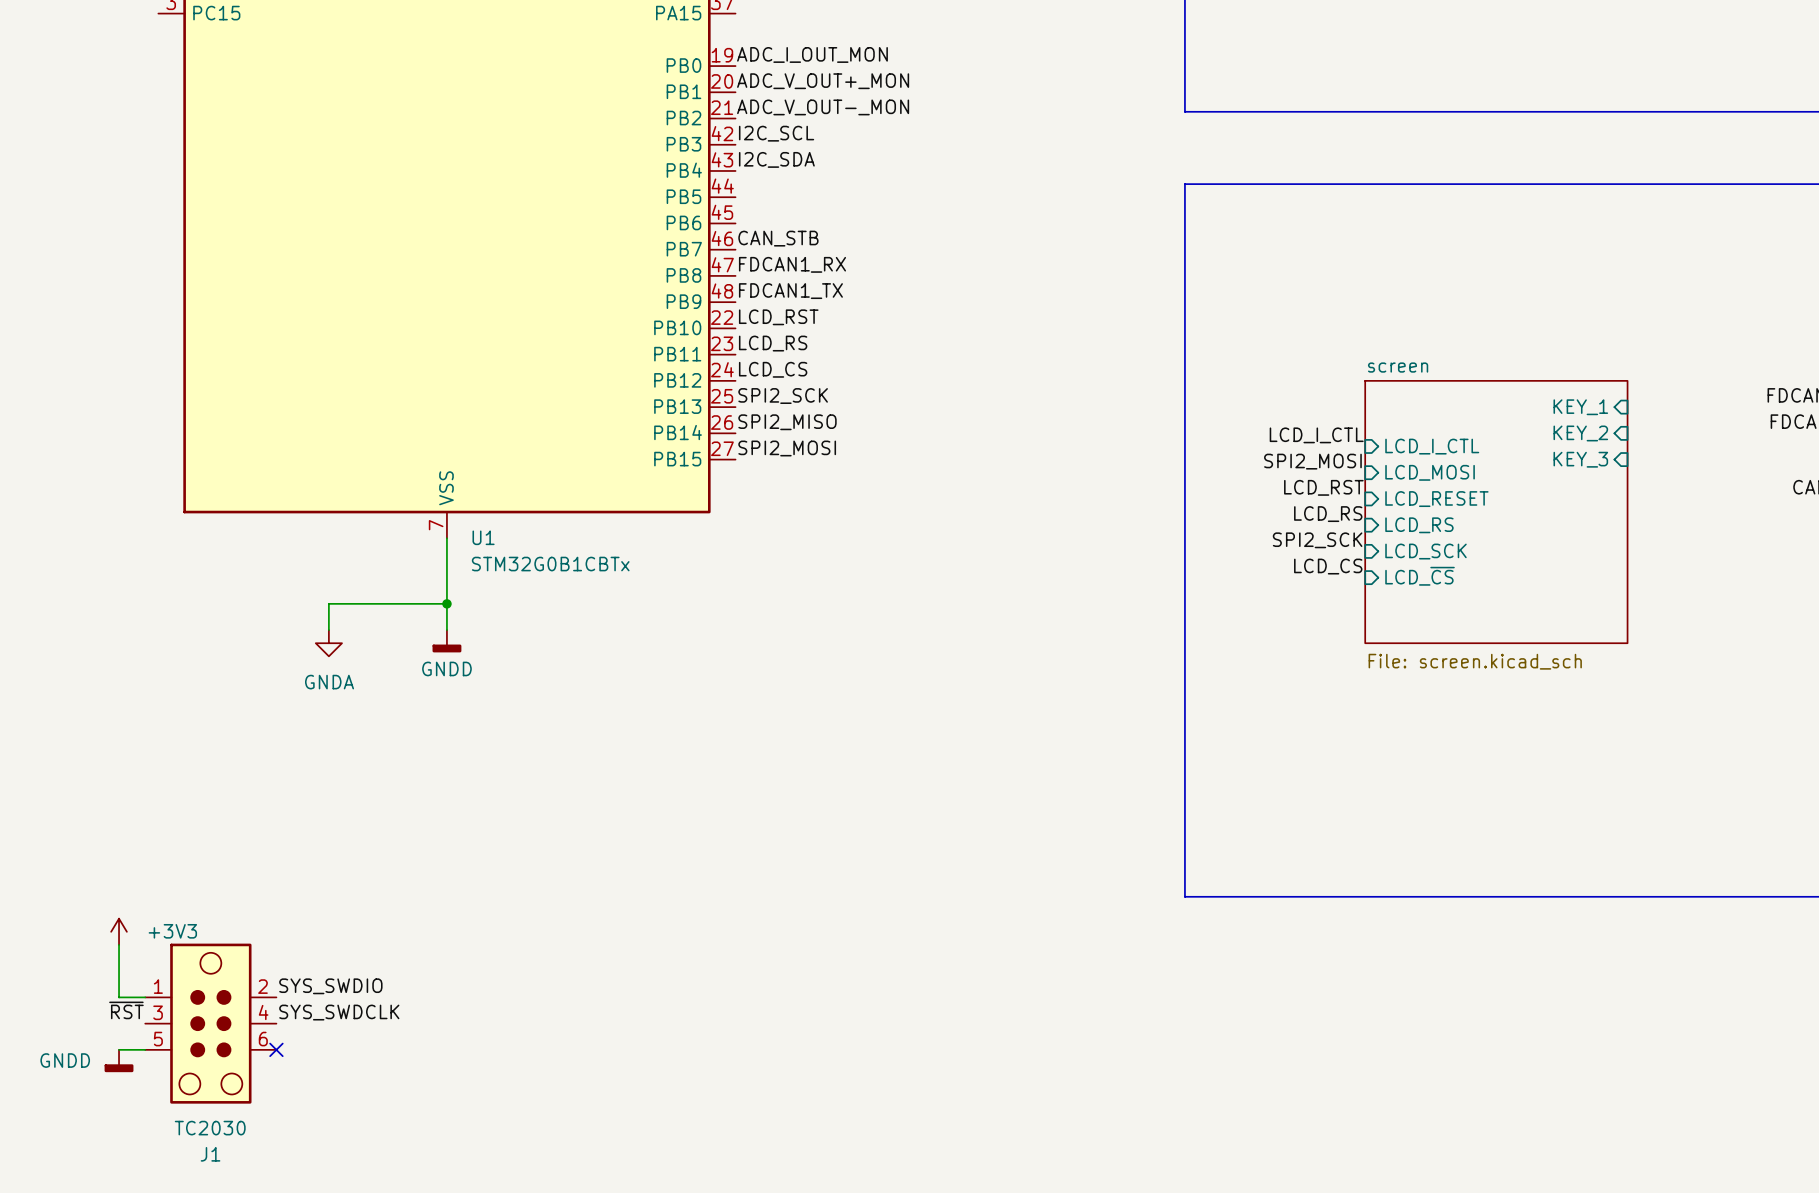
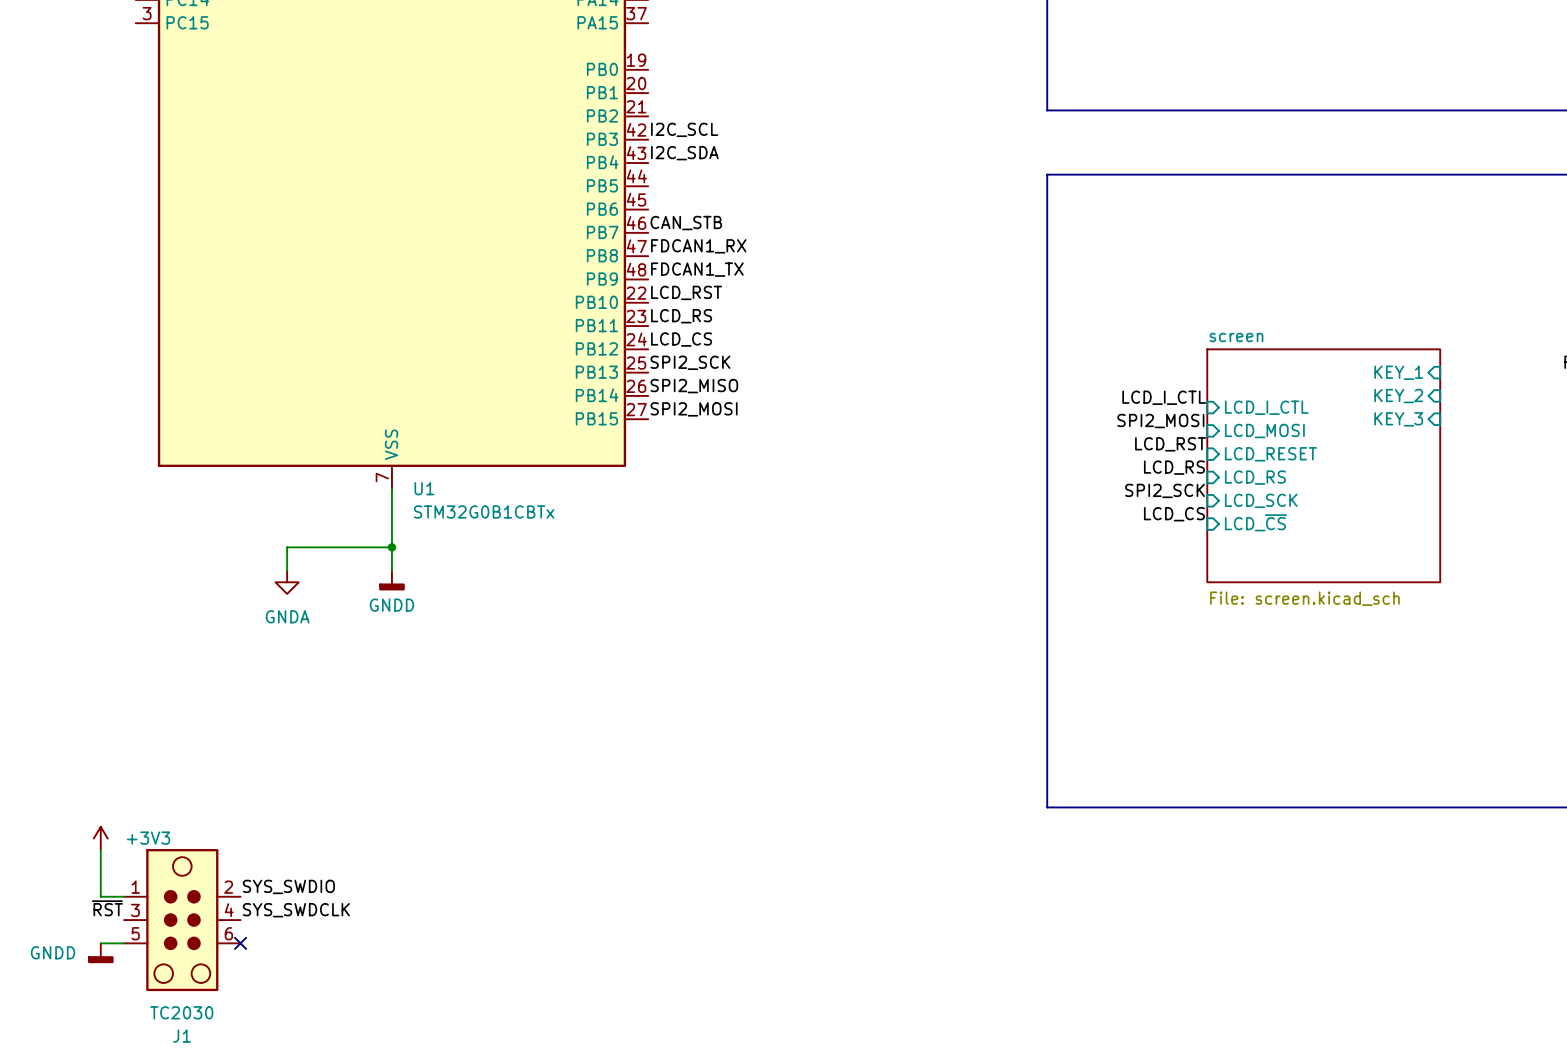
label: ADC_I_OUT_MON (812, 54) -> none
label: ADC_V_OUT+_MON (823, 81) -> none
label: ADC_V_OUT-_MON (823, 107) -> none

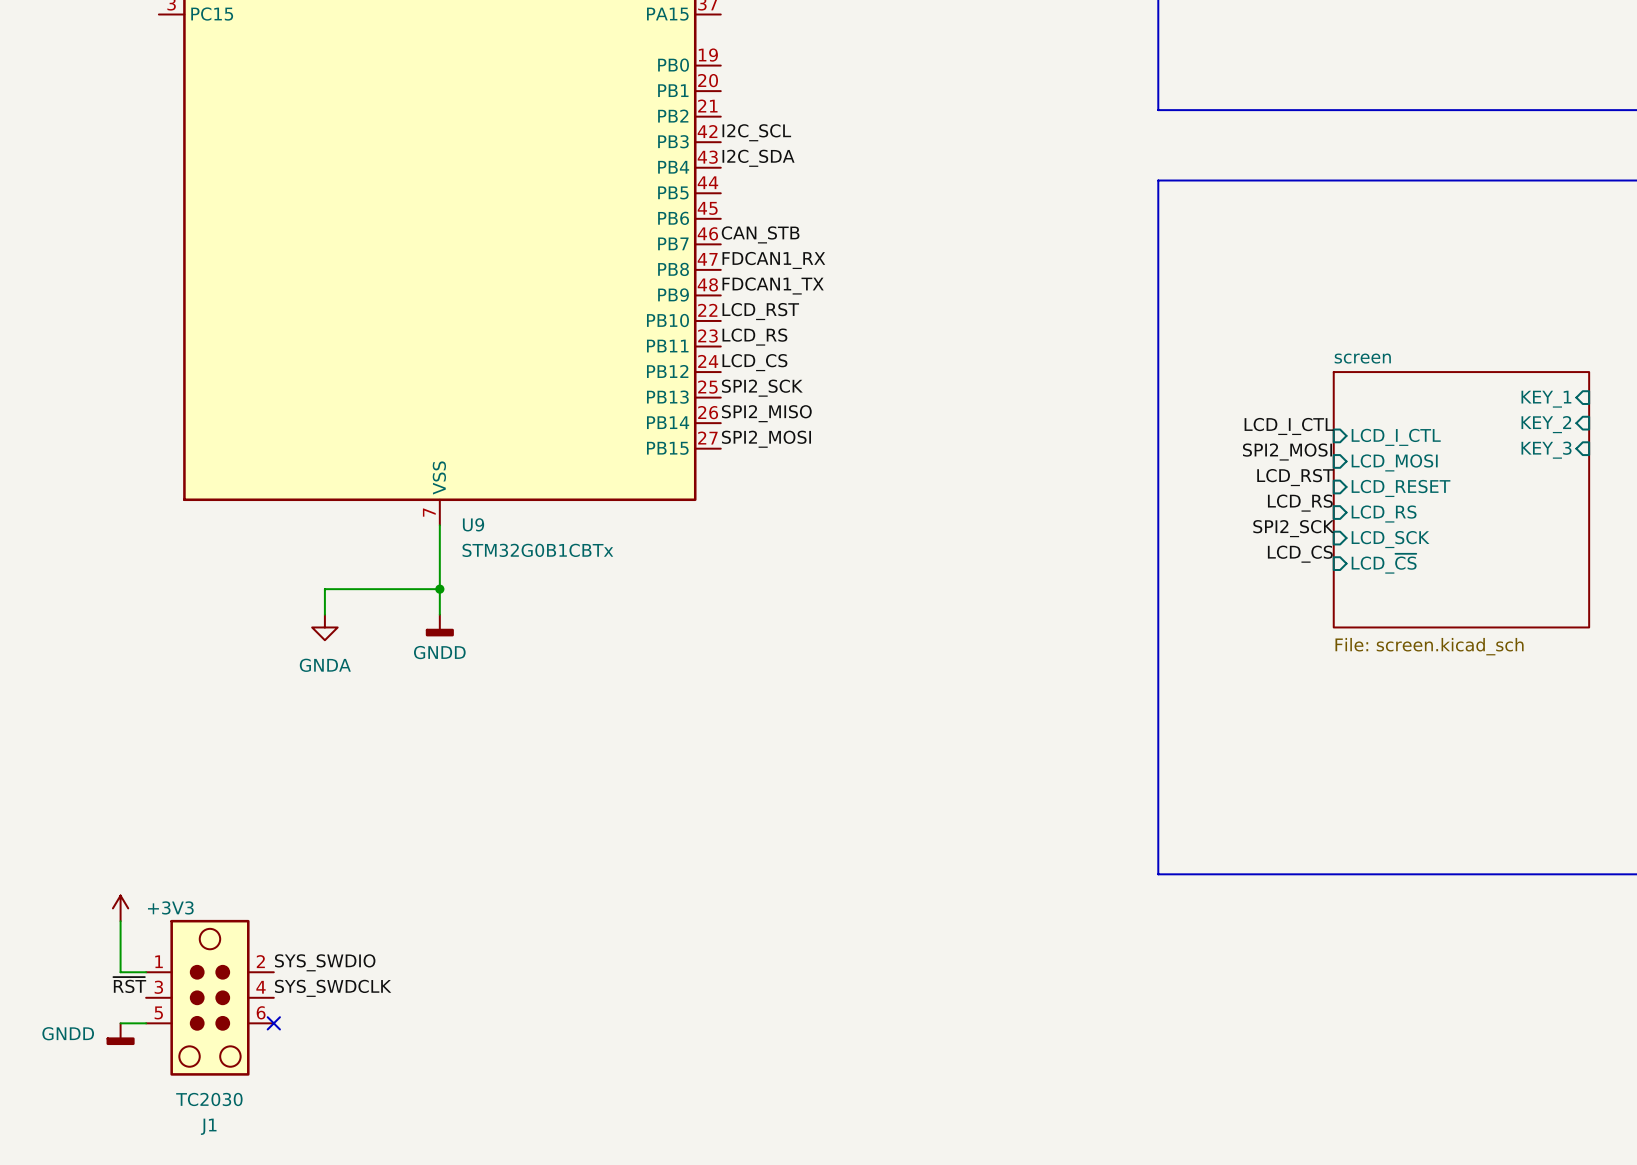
U1 name: U1 (424, 488) -> U9 (473, 524)

